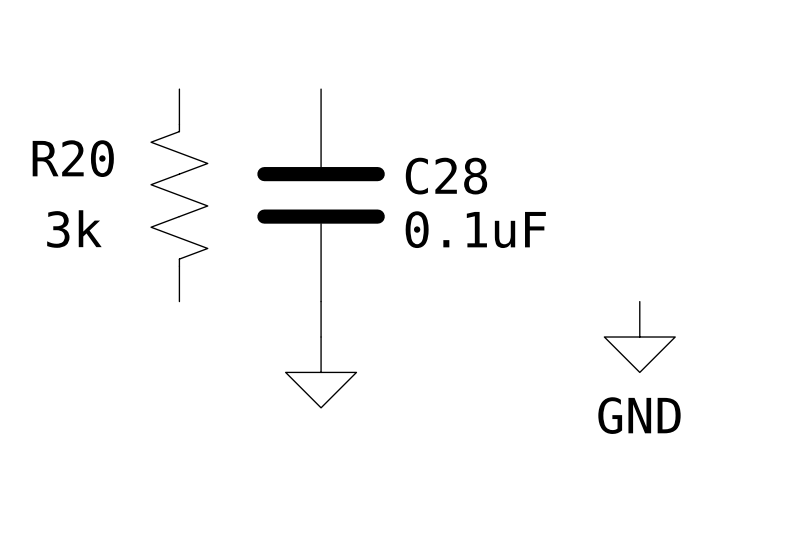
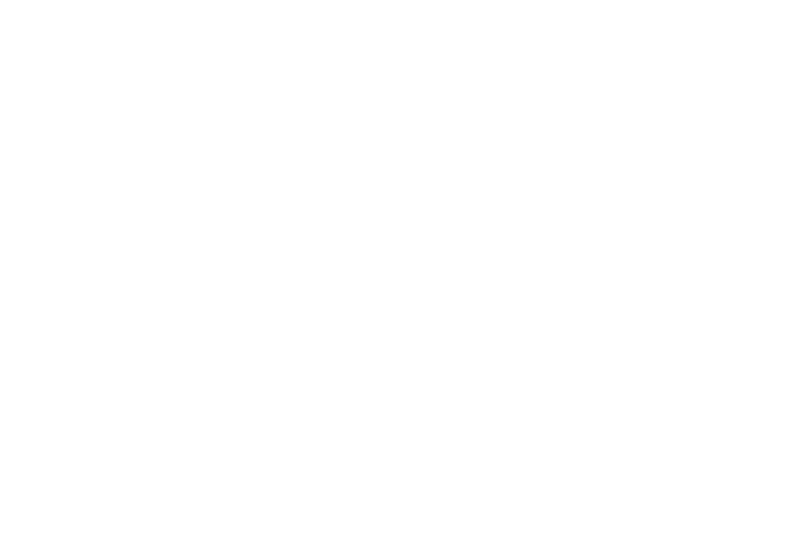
R20: 3k (179, 195) -> none
C28: 0.1uF (321, 195) -> none
wire: (321, 301) (321, 337) -> none
power symbol: GND (639, 337) -> none
power symbol: (321, 372) -> none

